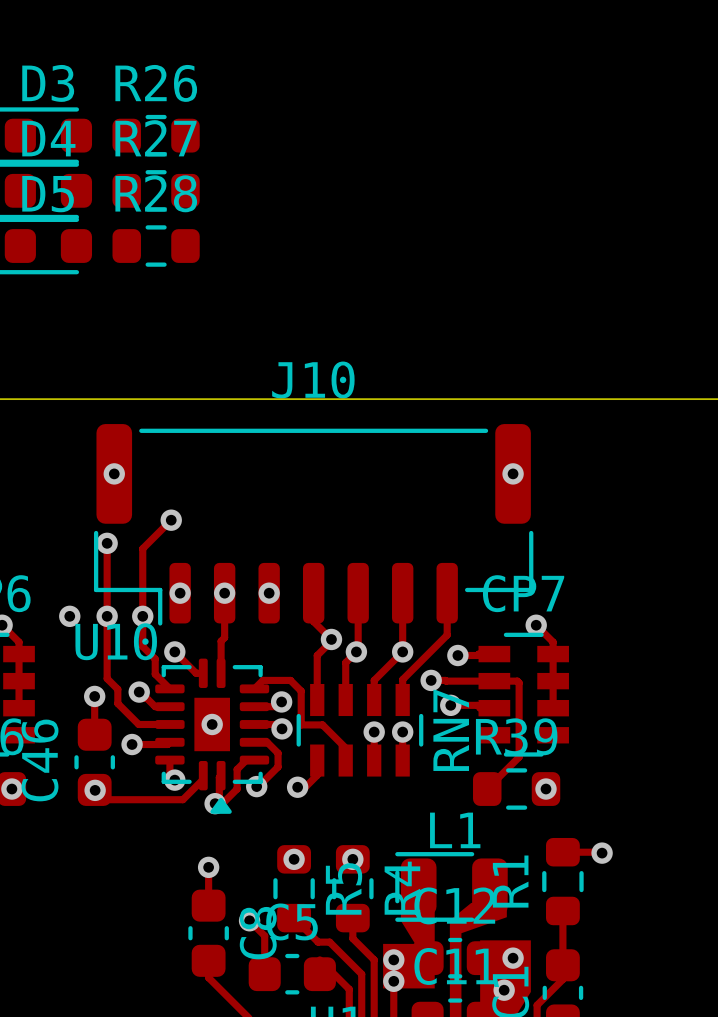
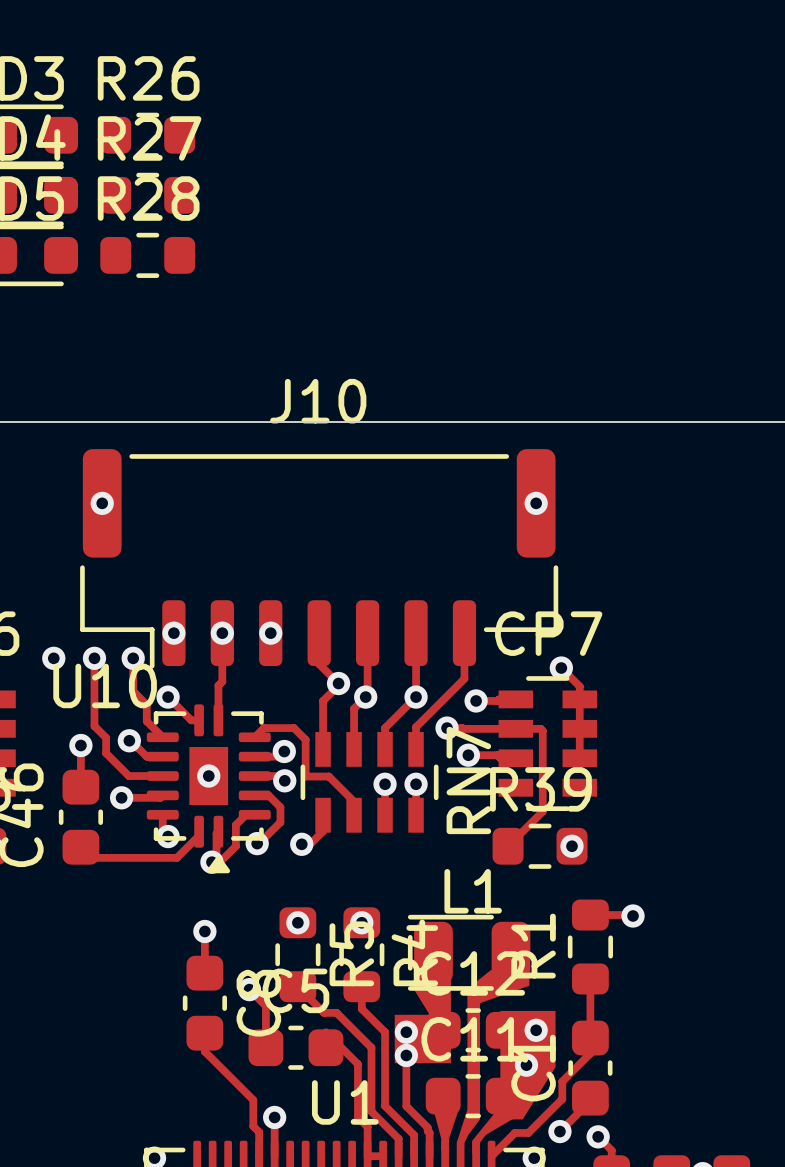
track: (171, 520) (142, 548) (142, 616) -> none
via: (171, 520) -> none
track: (107, 543) (107, 616) -> none
via: (107, 543) -> none
via: (95, 790) -> none

